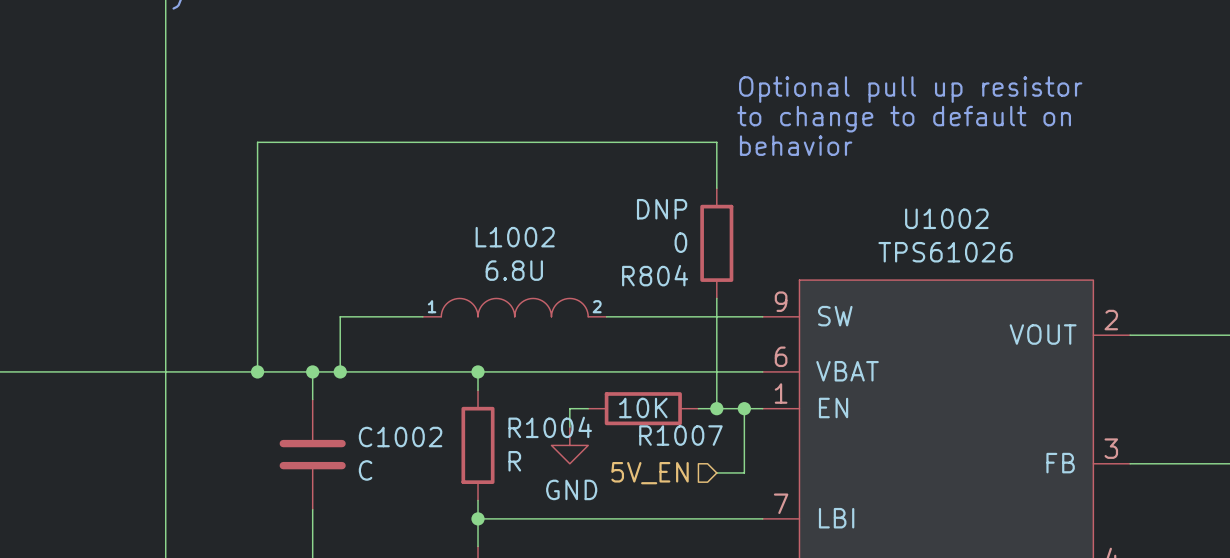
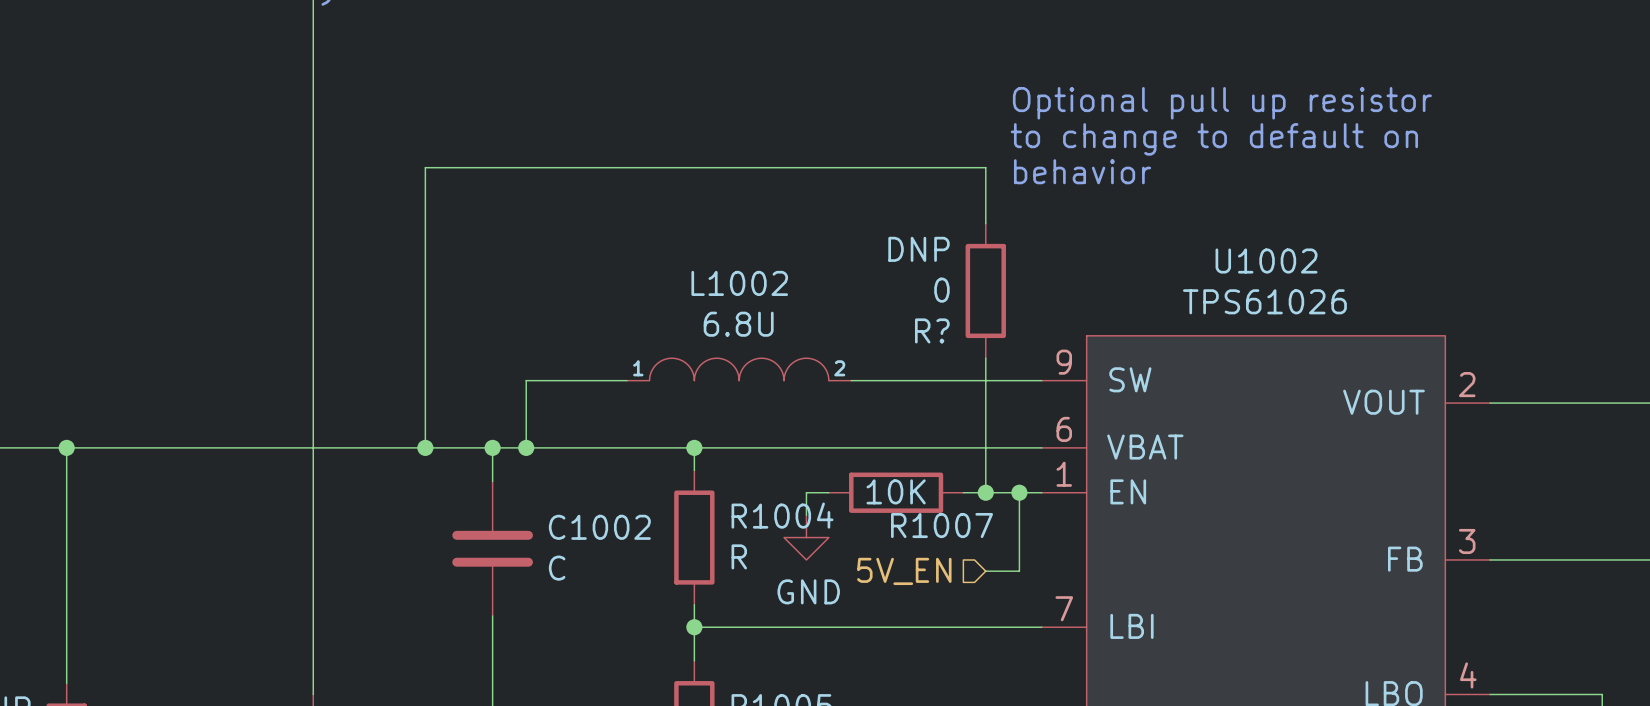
R804 name: R804 (655, 275) -> R? (932, 330)

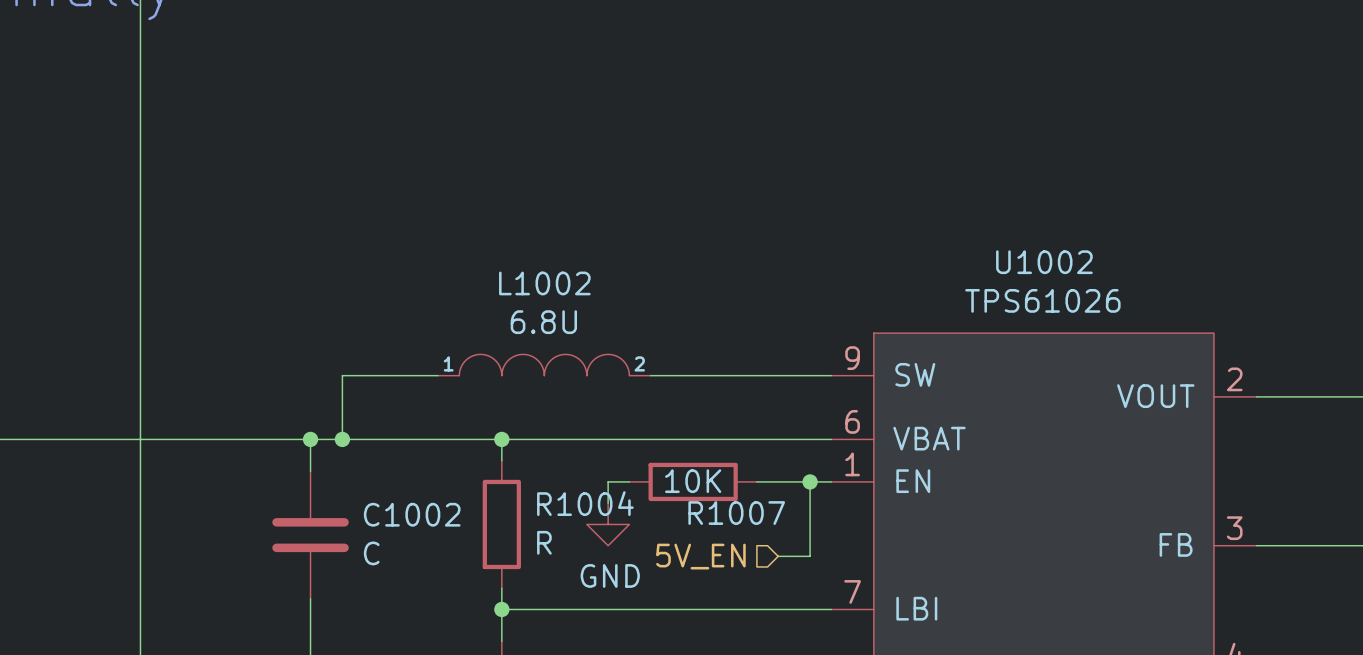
text: Optional pull up resistor (1222, 103) -> none
text: to change to default on (1214, 139) -> none
text: behavior (1082, 171) -> none
wire: (985, 223) (985, 167) (425, 167) (425, 447) -> none
R?: 0 (985, 290) -> none
wire: (985, 358) (985, 492) -> none
junction: (425, 447) -> none
junction: (985, 492) -> none

